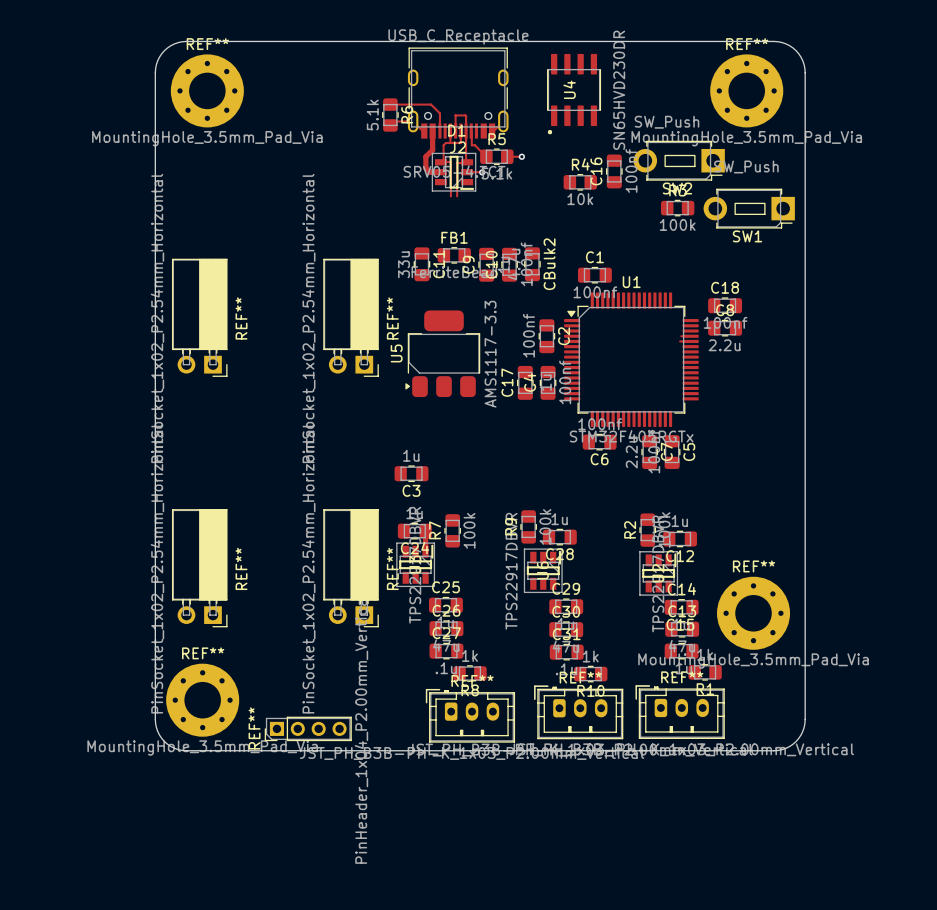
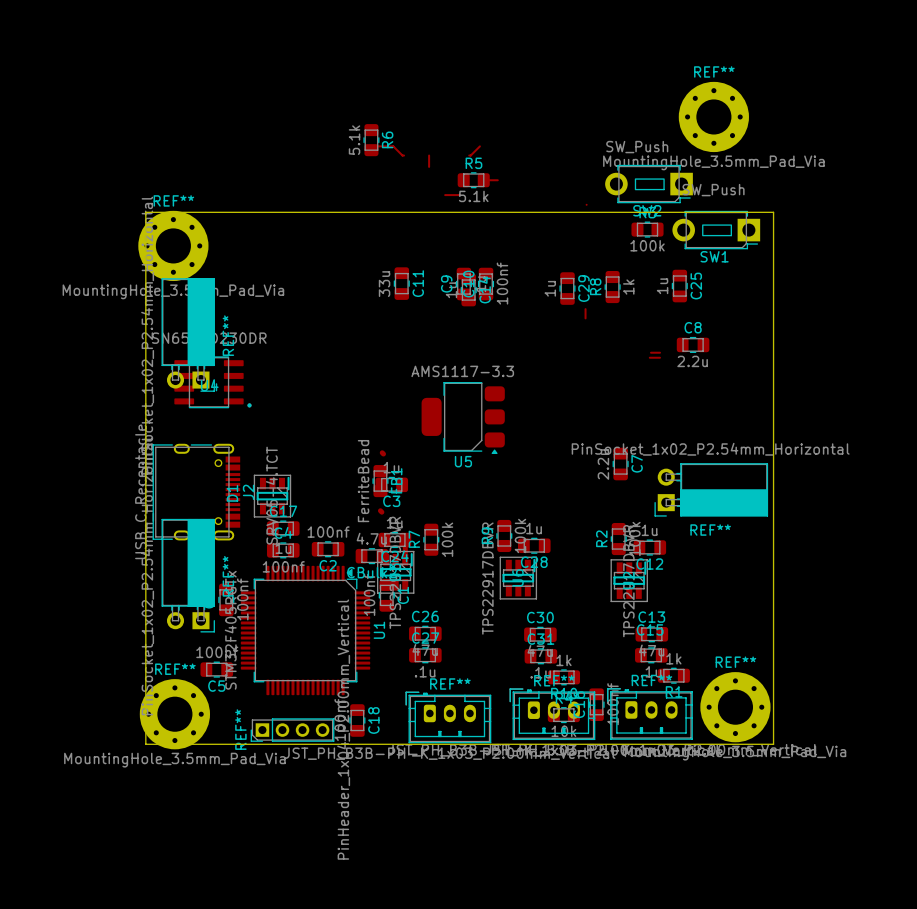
board edge: (186, 41) (773, 41) (785, 43) (798, 53) (802, 60) (805, 72) (805, 719) (800, 735) (792, 744) (785, 748) (773, 750) (186, 750) (174, 748) (161, 738) (157, 731) (155, 719) (155, 72) (157, 60) (164, 50) (174, 43) (186, 41) -> (145, 212) (145, 744) (773, 744) (773, 212) (145, 212)
REF** position: (207, 90) -> (173, 245)
J2 rotation: 0° (458, 93) -> 90° counterclockwise (196, 492)
J2 position: (458, 93) -> (196, 492)
U4 rotation: 0° (574, 94) -> 90° counterclockwise (212, 382)
U4 position: (574, 94) -> (212, 382)
track: (390, 104) (431, 104) (439, 113) (439, 131) -> none
track: (455, 115) (466, 116) -> none
track: (455, 115) (455, 131) -> none
track: (466, 116) (466, 161) -> none
track: (432, 131) (432, 149) (425, 156) (425, 168) (429, 172) (441, 172) -> none
track: (460, 131) (460, 143) (445, 142) (443, 145) (443, 159) (441, 162) -> none
track: (471, 131) (471, 145) (474, 145) (486, 156) -> none
via: (521, 156) -> none
track: (465, 160) (466, 163) (457, 163) (457, 196) -> none
track: (441, 161) (450, 161) (450, 196) -> none
C16 position: (614, 171) -> (596, 704)
D1 rotation: 0° (454, 172) -> 90° counterclockwise (272, 496)
D1 position: (454, 172) -> (272, 496)
via: (482, 172) -> none
R4 position: (580, 182) -> (563, 715)
FB1 rotation: 0° (454, 255) -> 90° clockwise (380, 481)
FB1 position: (454, 255) -> (380, 481)
CBulk2 rotation: 0° (532, 264) -> 90° clockwise (371, 556)
CBulk2 position: (532, 264) -> (371, 556)
C1 rotation: 0° (594, 275) -> 90° clockwise (386, 595)
C1 position: (594, 275) -> (386, 595)
C18 rotation: 0° (725, 305) -> 90° clockwise (357, 720)
C18 position: (725, 305) -> (357, 720)
REF**: PinSocket_1x02_P2.54mm_Horizontal (351, 317) -> none
C2 rotation: 0° (546, 336) -> 90° clockwise (328, 549)
C2 position: (546, 336) -> (328, 549)
U5 rotation: 0° (442, 353) -> 90° counterclockwise (463, 418)
U5 position: (442, 353) -> (463, 418)
U1 rotation: 0° (631, 359) -> 90° clockwise (305, 630)
U1 position: (631, 359) -> (305, 630)
C17 rotation: 0° (525, 382) -> 90° clockwise (283, 528)
C17 position: (525, 382) -> (283, 528)
C4 rotation: 0° (548, 382) -> 90° clockwise (283, 550)
C4 position: (548, 382) -> (283, 550)
track: none -> (382, 452) (383, 454)
C6 rotation: 0° (599, 442) -> 90° clockwise (226, 599)
C6 position: (599, 442) -> (226, 599)
C5 rotation: 0° (672, 452) -> 90° clockwise (216, 669)
C5 position: (672, 452) -> (216, 669)
REF**: none -> PinSocket_1x02_P2.54mm_Horizontal (711, 489)
track: none -> (380, 510) (381, 512)
REF**: PinSocket_1x02_P2.54mm_Horizontal (351, 568) -> none
C25 rotation: 0° (445, 605) -> 90° clockwise (679, 286)
C25 position: (445, 605) -> (679, 286)
C29 rotation: 0° (566, 606) -> 90° clockwise (567, 288)
C29 position: (566, 606) -> (567, 288)
C14 rotation: 0° (681, 607) -> 90° clockwise (468, 290)
C14 position: (681, 607) -> (468, 290)
REF** position: (753, 613) -> (735, 707)
R8 rotation: 0° (469, 673) -> 90° clockwise (612, 287)
R8 position: (469, 673) -> (612, 287)
REF** position: (202, 700) -> (174, 714)

